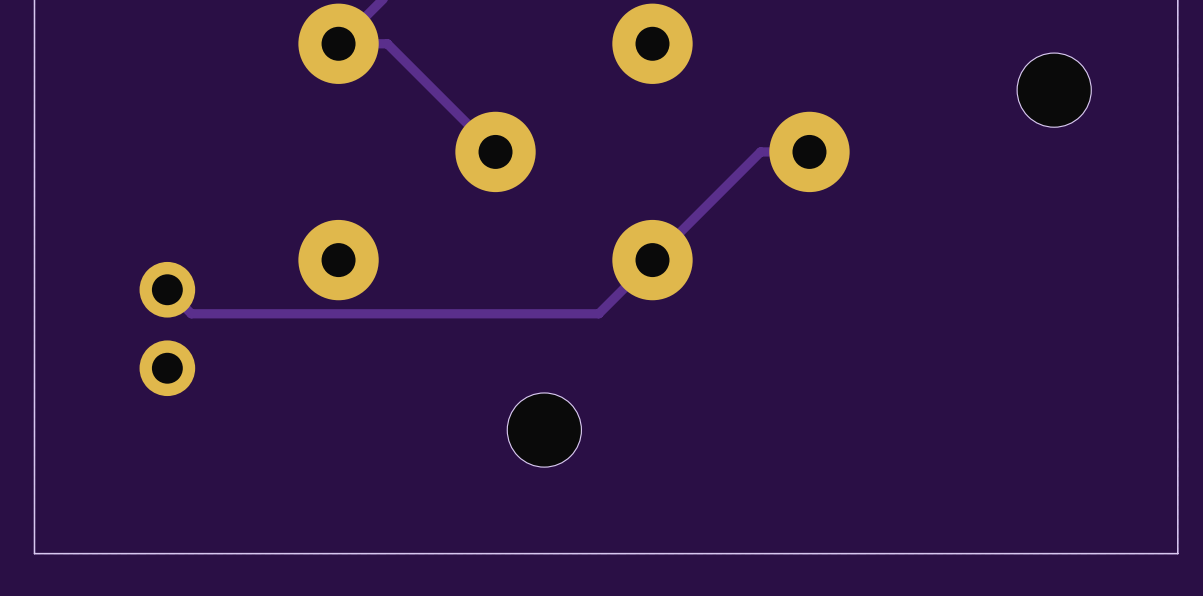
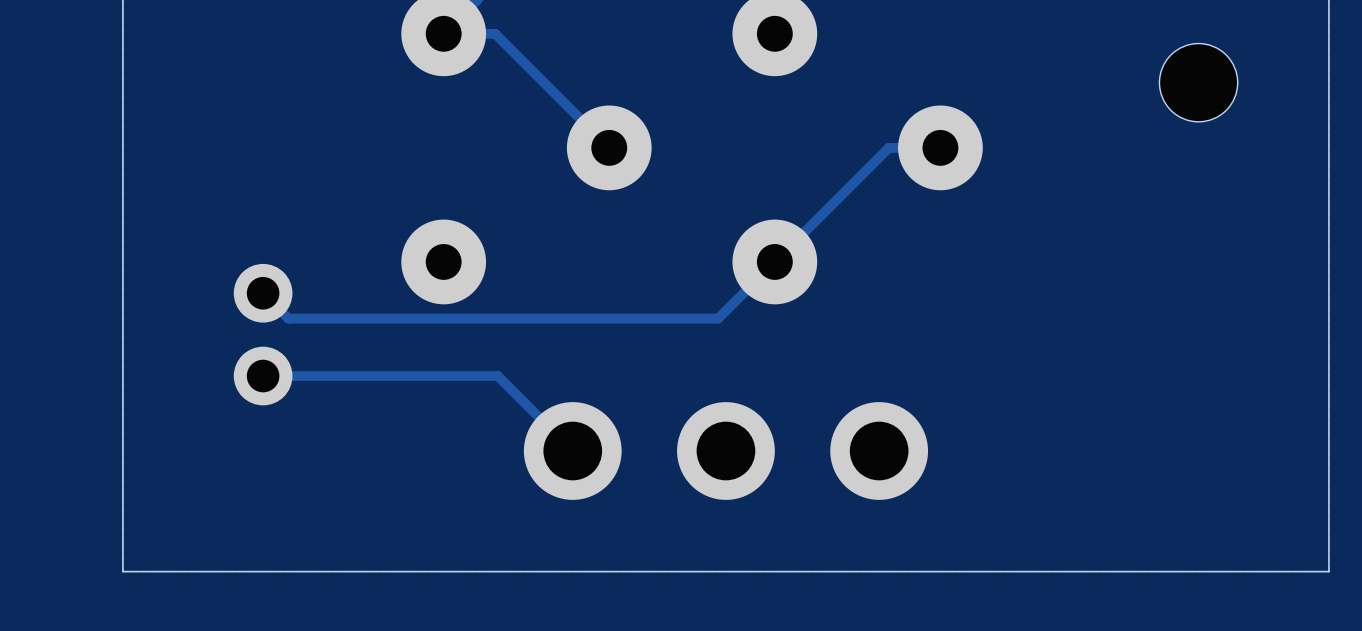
track: none -> (263, 376) (497, 376) (572, 451)
part: (544, 430) -> none
part: none -> (725, 451)

